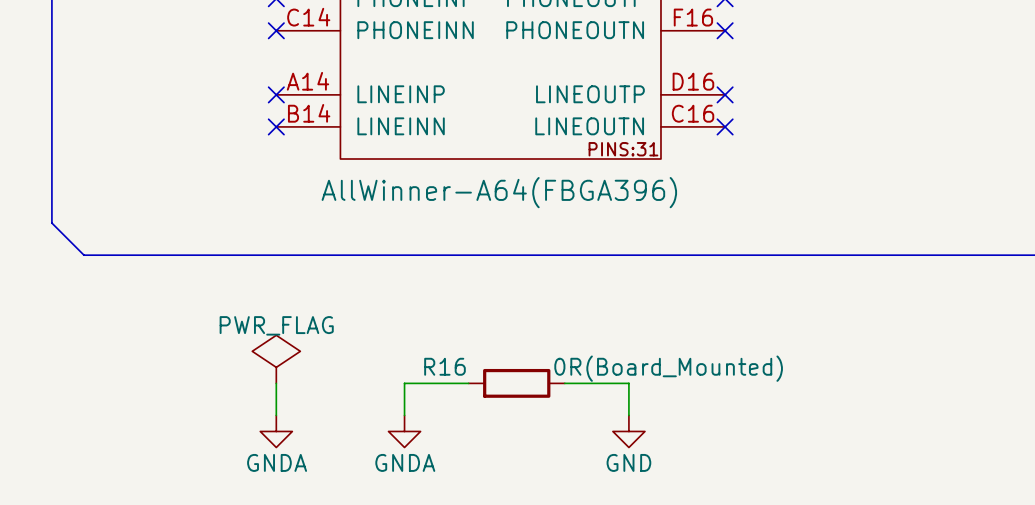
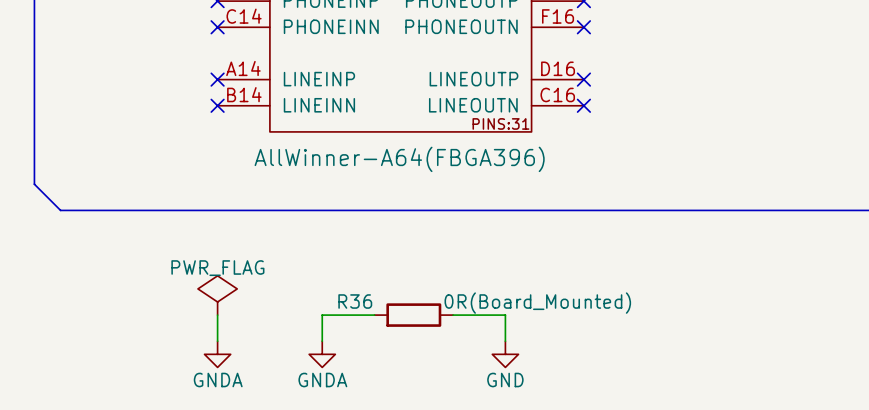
R16 name: R16 (444, 366) -> R36 (355, 301)

